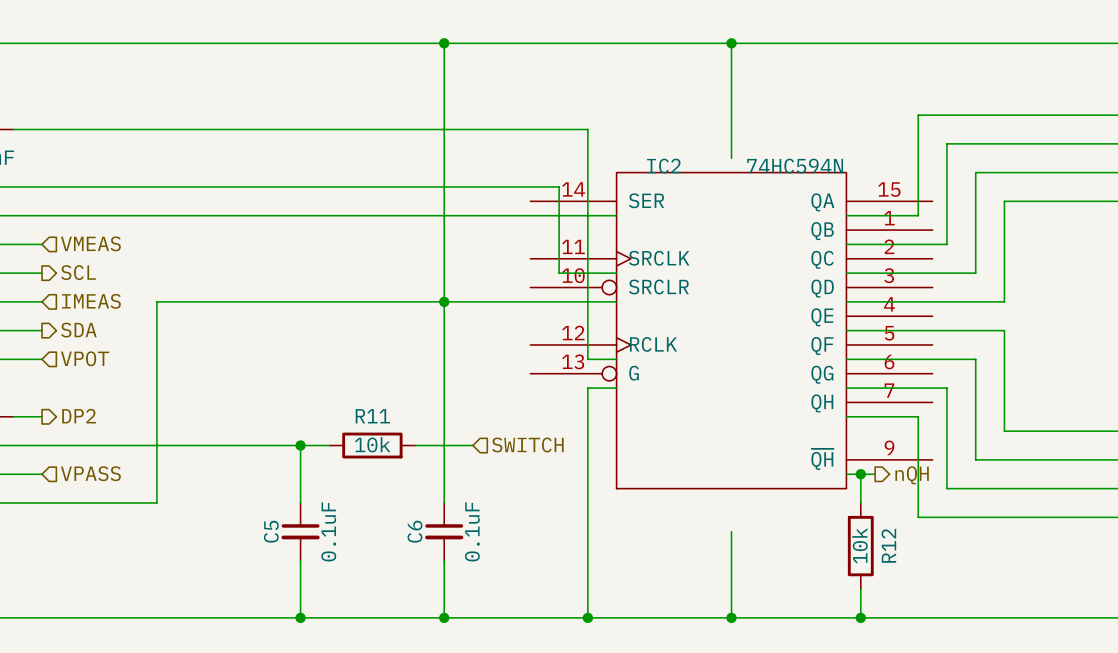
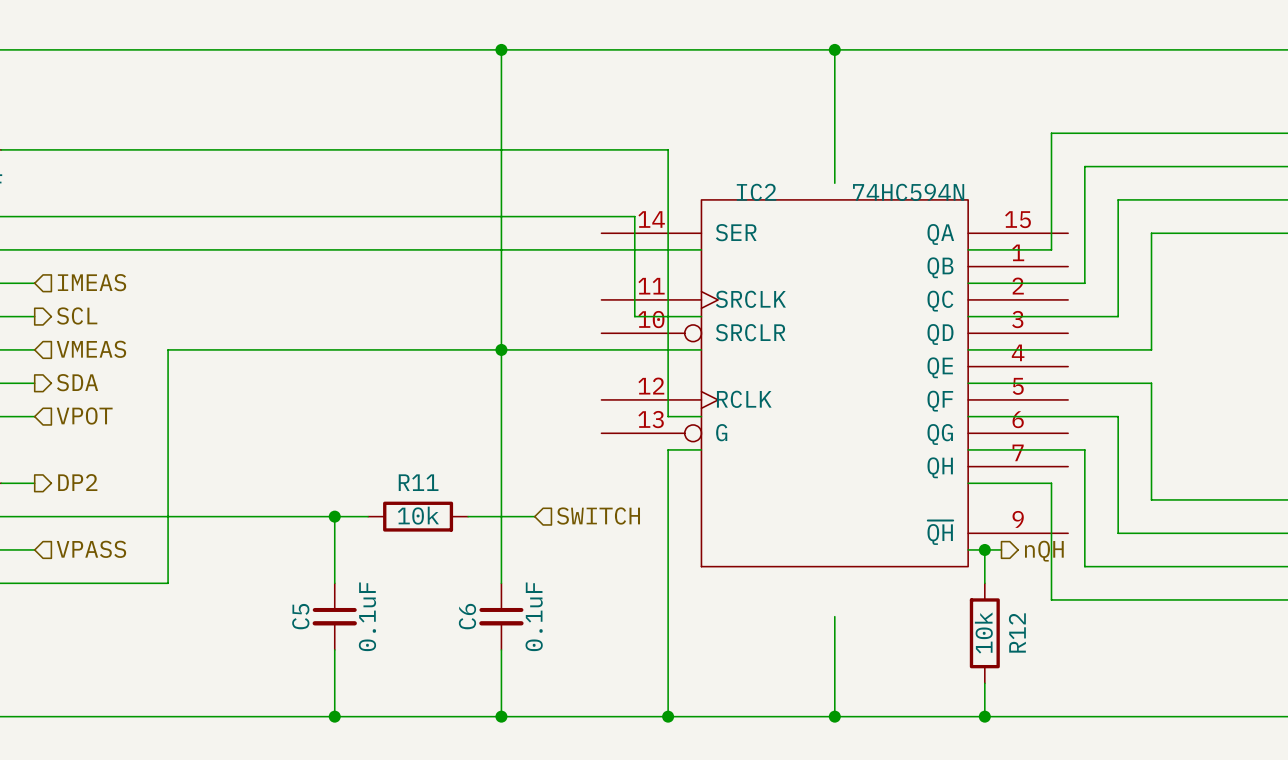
hierarchical label: VMEAS (90, 243) -> IMEAS (92, 282)
hierarchical label: IMEAS (91, 301) -> VMEAS (91, 349)

